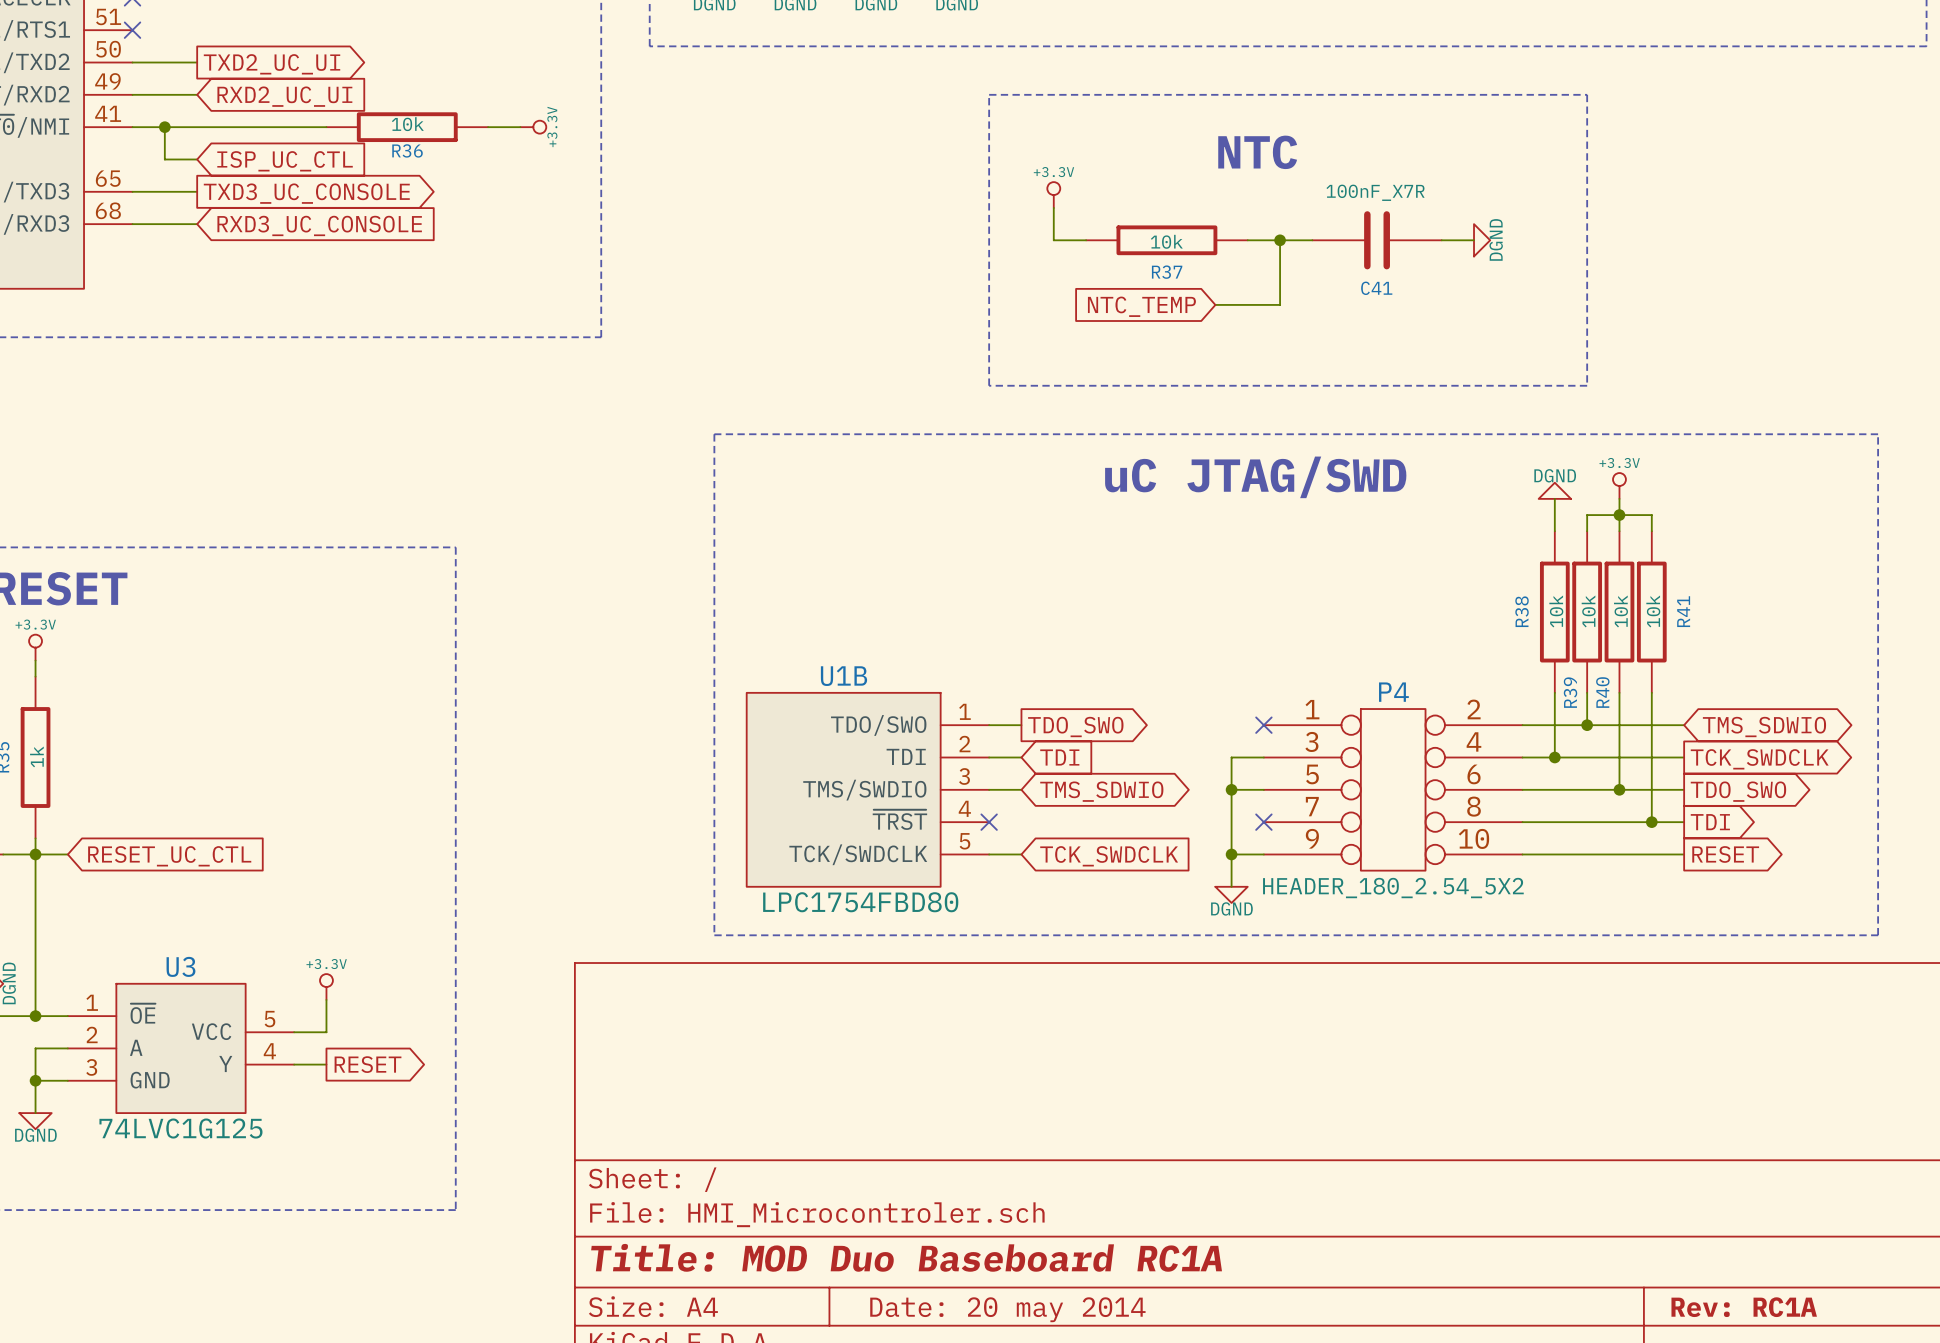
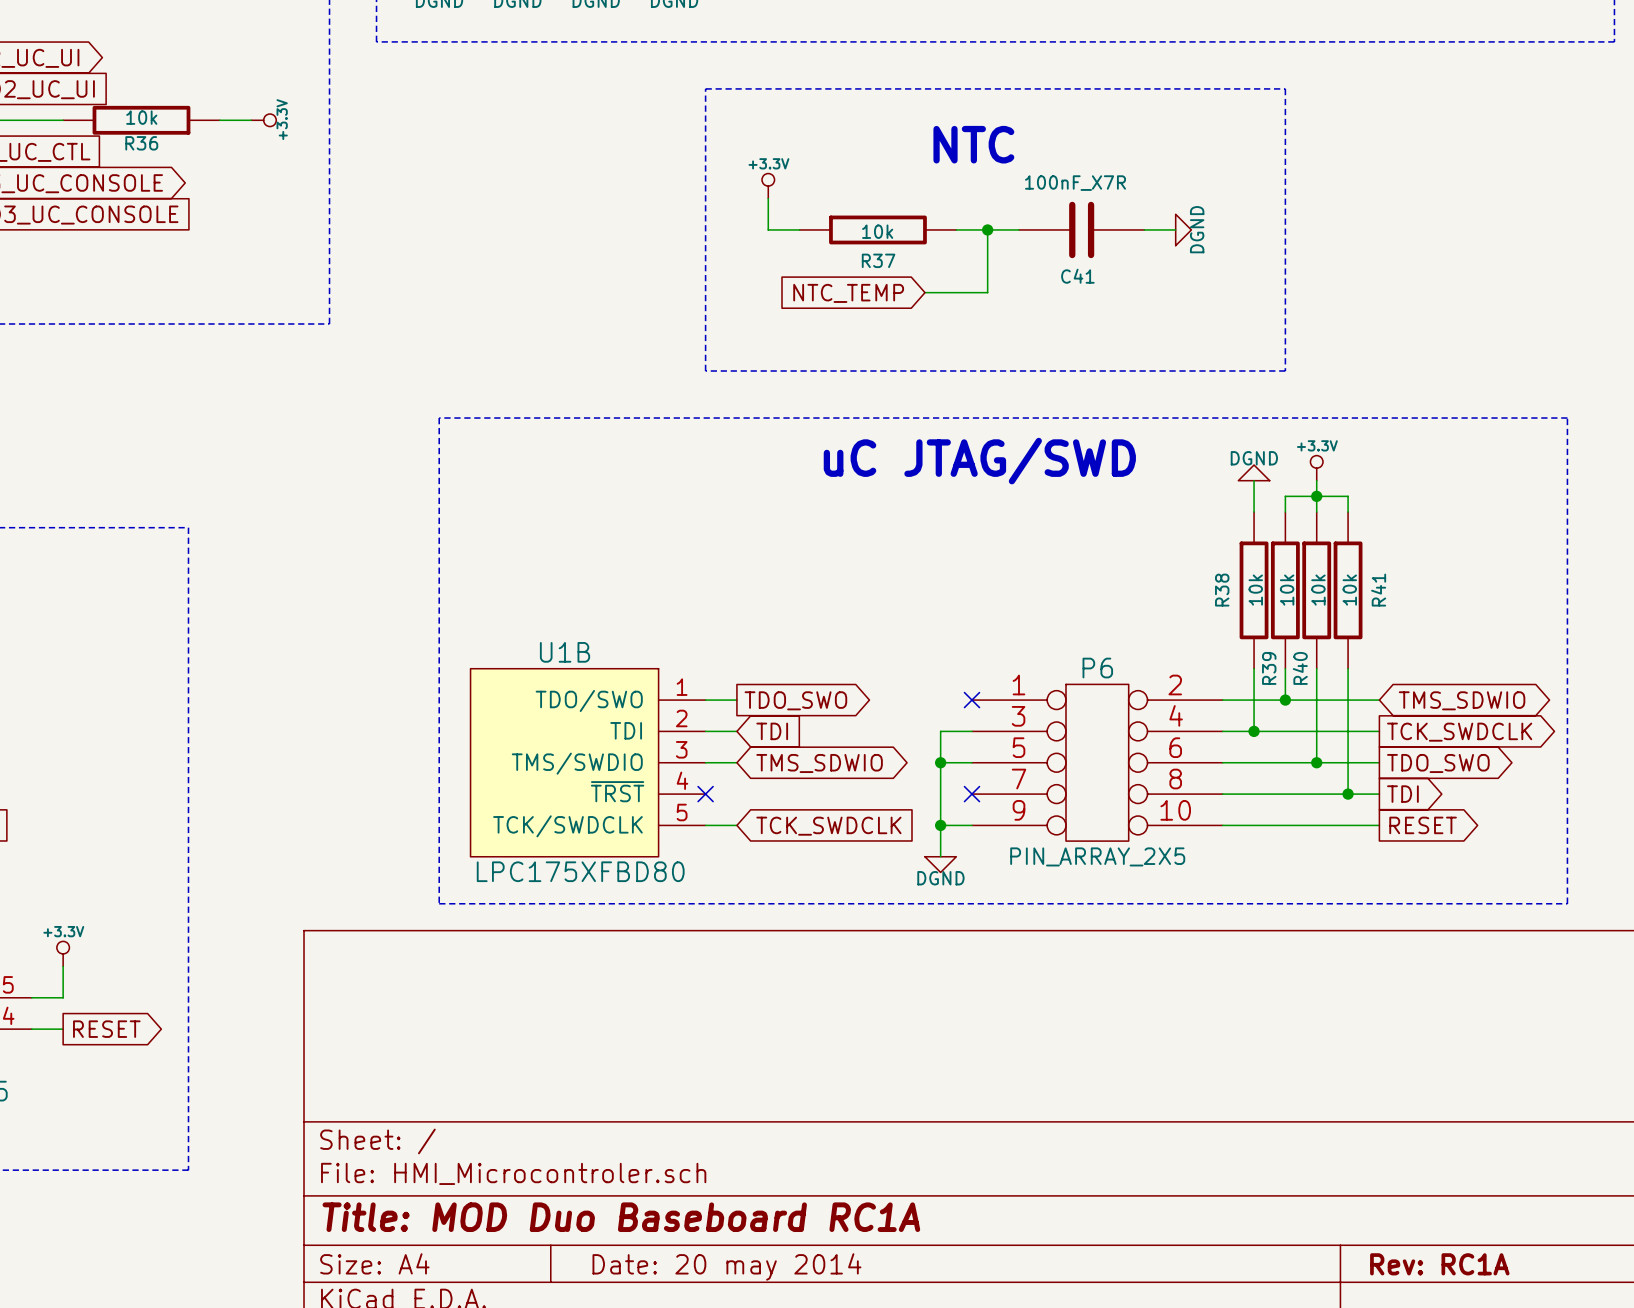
P4 name: P4 (1393, 692) -> P6 (1097, 668)
P4 value: HEADER_180_2.54_5X2 (1393, 888) -> PIN_ARRAY_2X5 (1097, 856)
U1B value: LPC1754FBD80 (860, 902) -> LPC175XFBD80 (580, 871)

